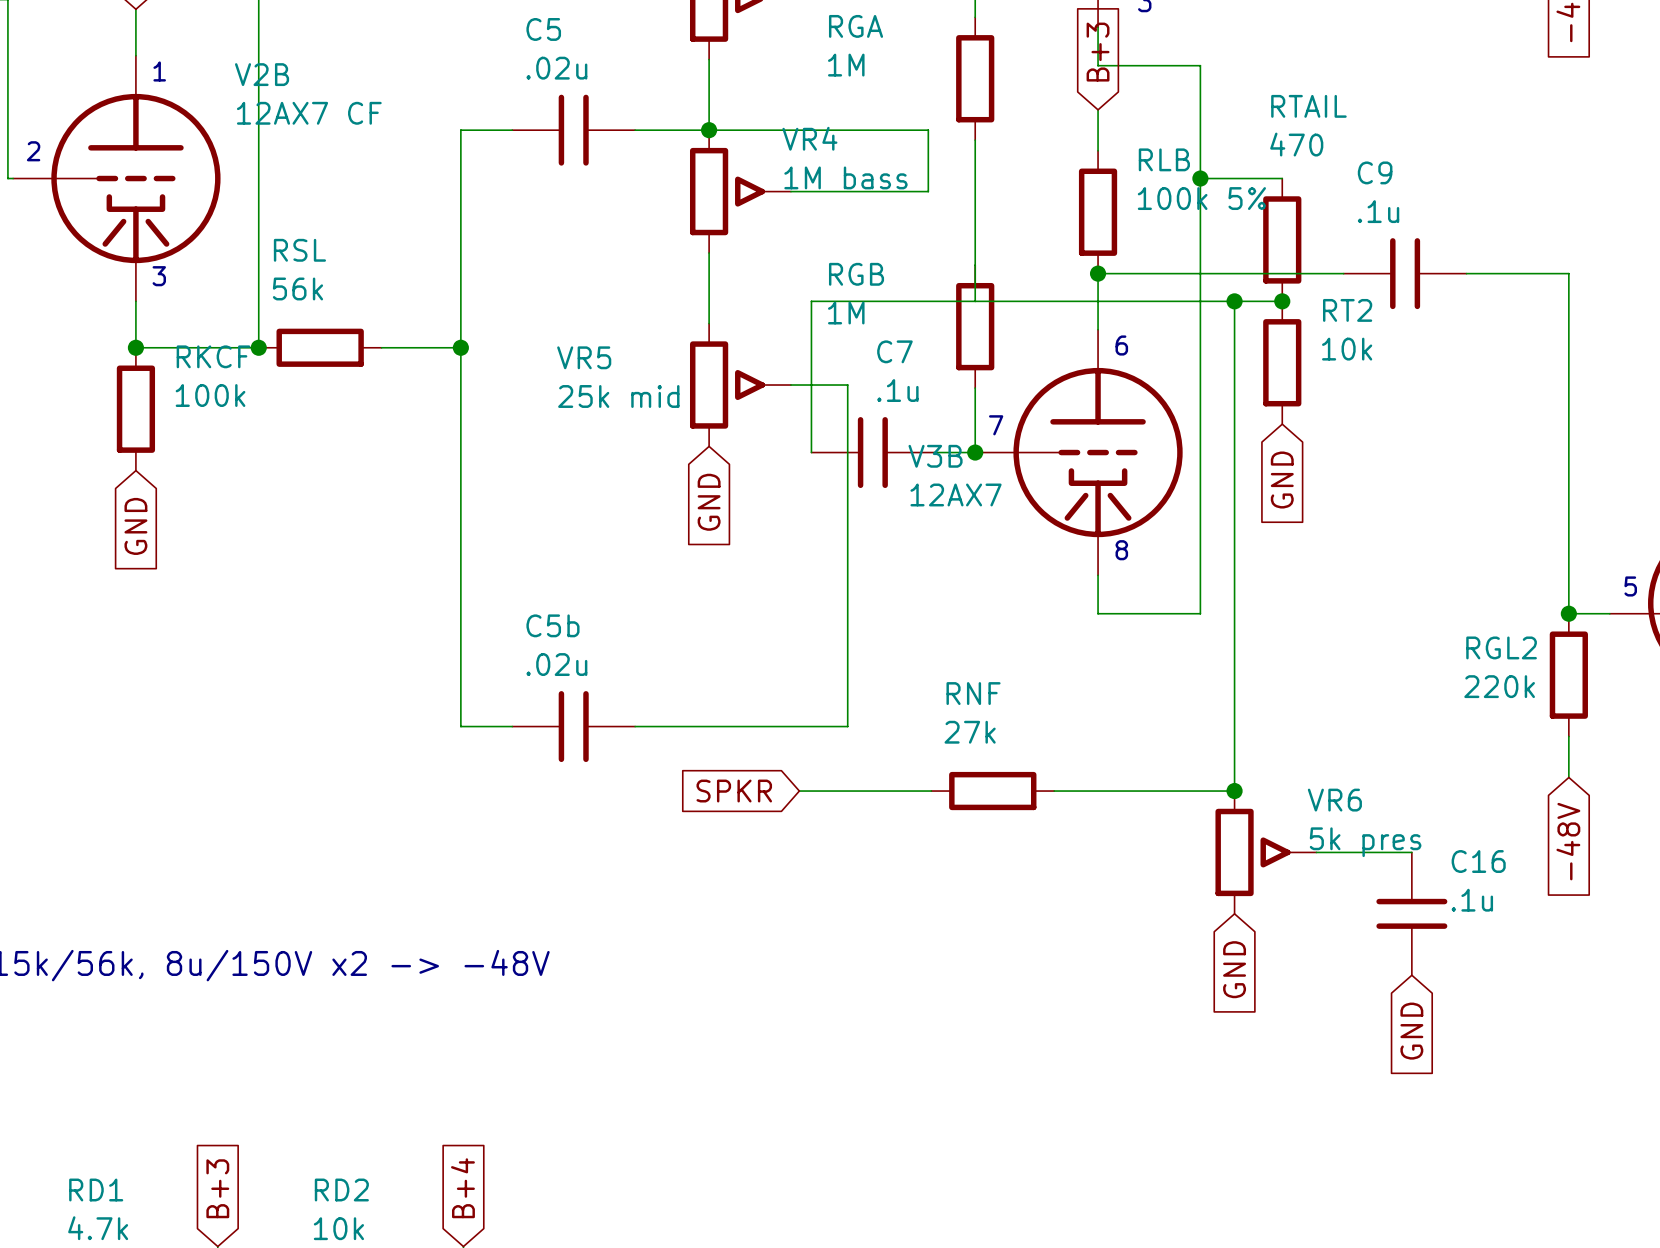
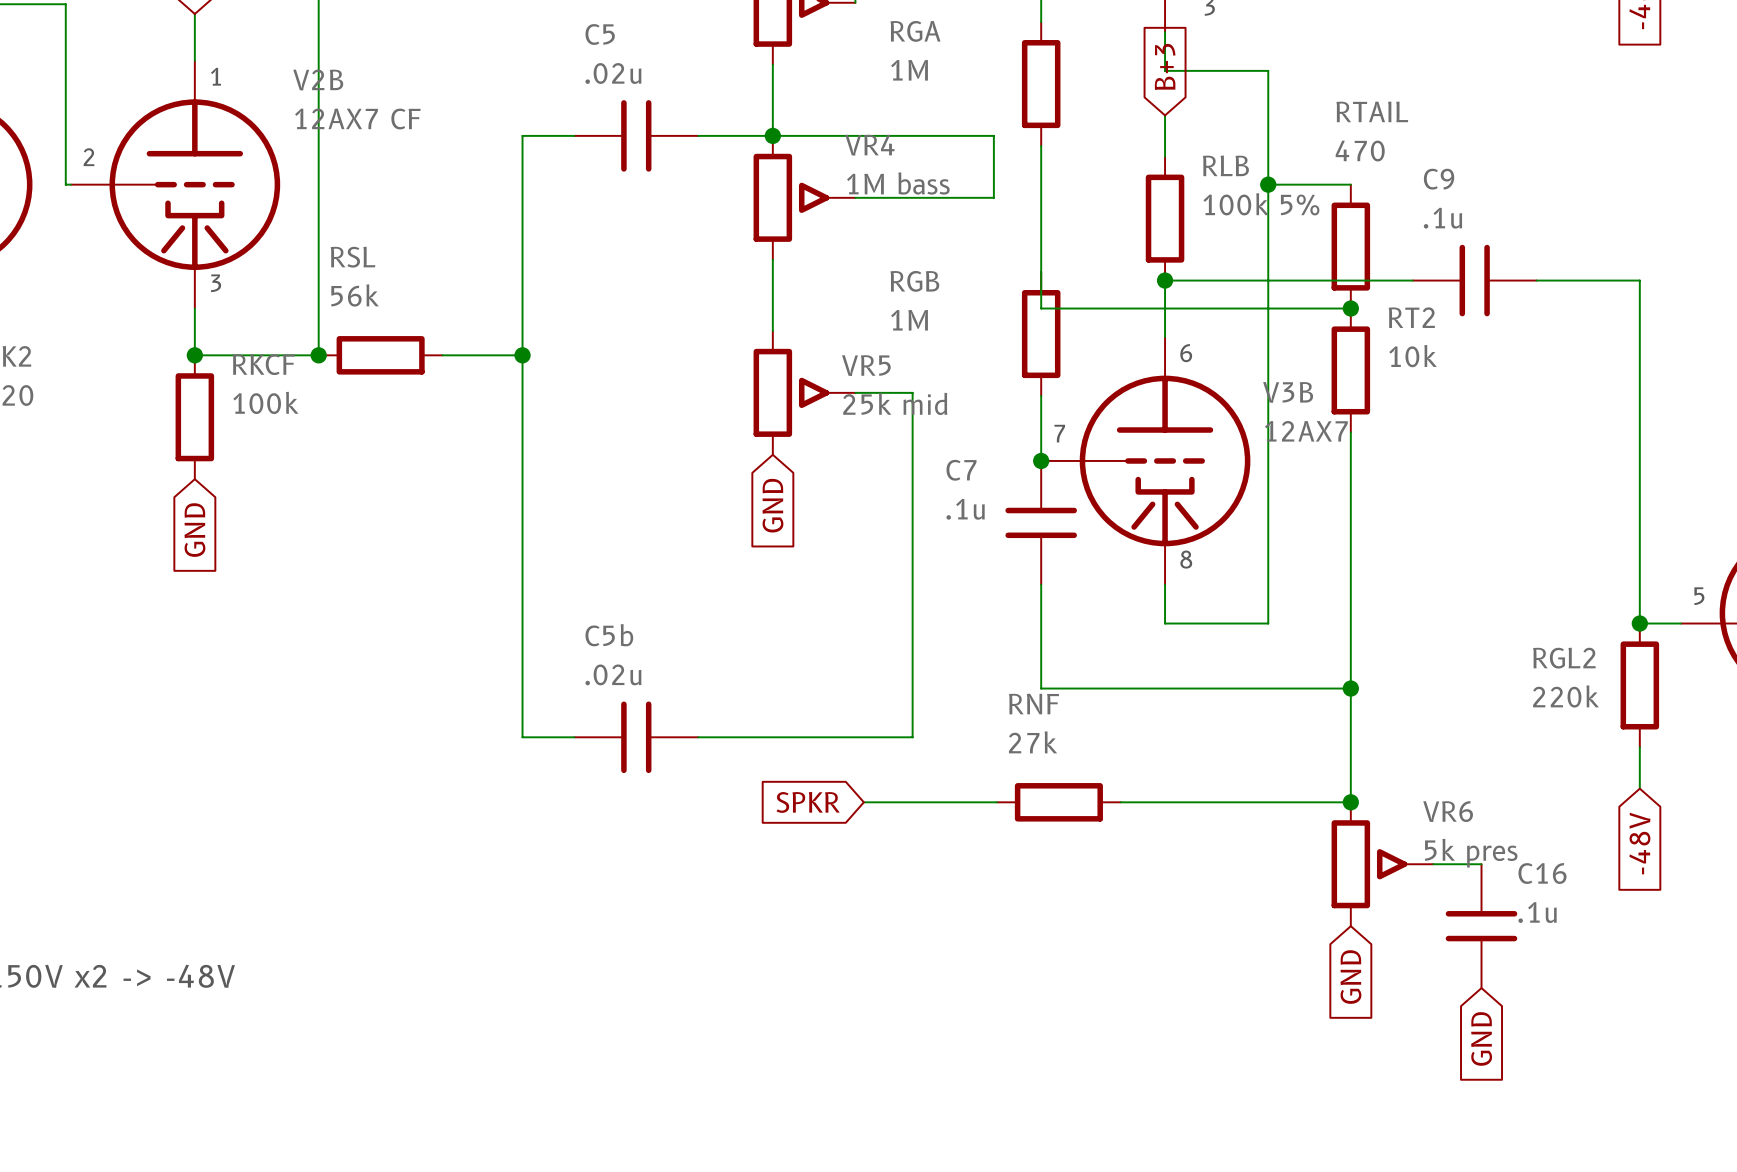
wire: (975, 301) (811, 301) (811, 452) -> none
wire: (1234, 301) (1234, 791) -> (1350, 432) (1350, 802) (1302, 802)
junction: (1234, 301) -> none
C7 name position: C7 (894, 351) -> C7 (961, 470)
VR5 name position: VR5 (584, 357) -> VR5 (866, 365)
C7 value position: .1u (897, 390) -> .1u (965, 509)
VR5 value position: 25k mid (618, 396) -> 25k mid (895, 403)
C7 rotation: 0° (872, 452) -> 90° clockwise (1041, 522)
C7 position: (872, 452) -> (1041, 522)
wire: (934, 452) (975, 452) -> none
V3B name position: V3B (935, 456) -> V3B (1288, 392)
global label: GND (1282, 480) -> none
V3B value position: 12AX7 (956, 494) -> 12AX7 (1306, 431)
wire: none -> (1041, 584) (1041, 688) (1350, 688)
junction: none -> (1350, 688)
junction position: (1234, 791) -> (1350, 802)
VR6 position: (1265, 852) -> (1382, 864)
global label position: GND (1234, 969) -> GND (1350, 977)

